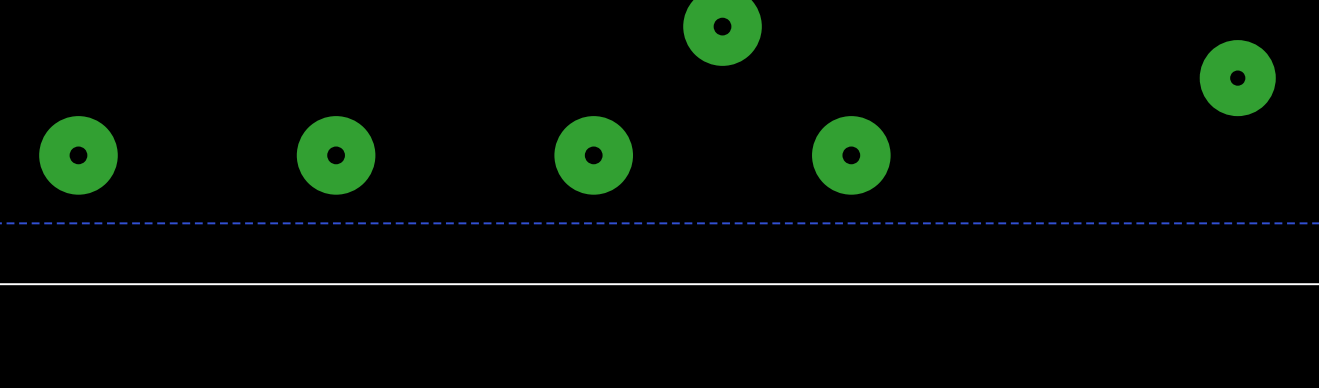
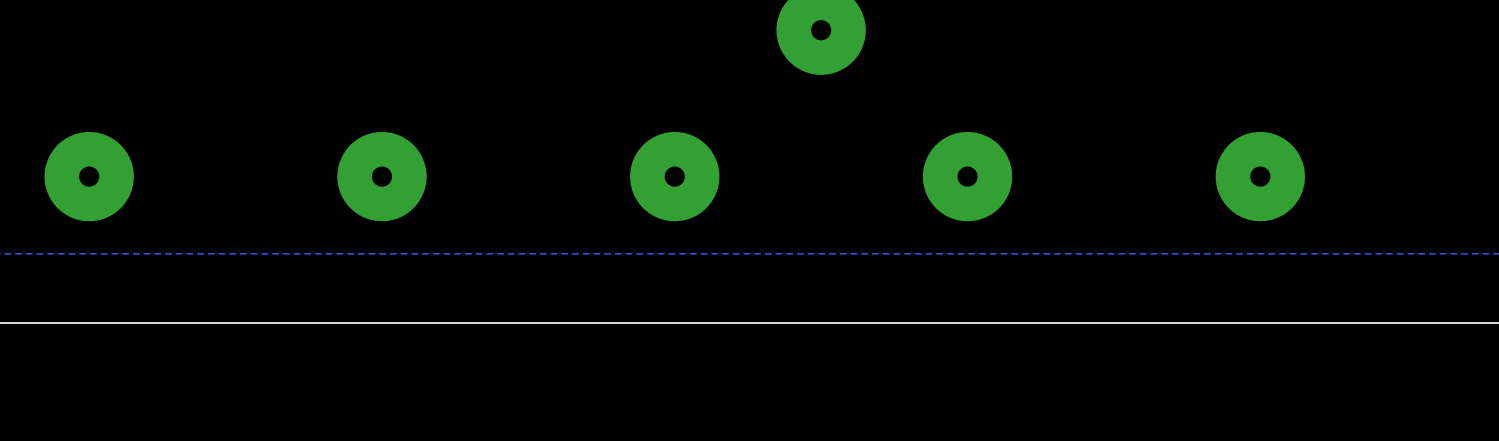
via: (1237, 78) -> none
via: none -> (1260, 176)

